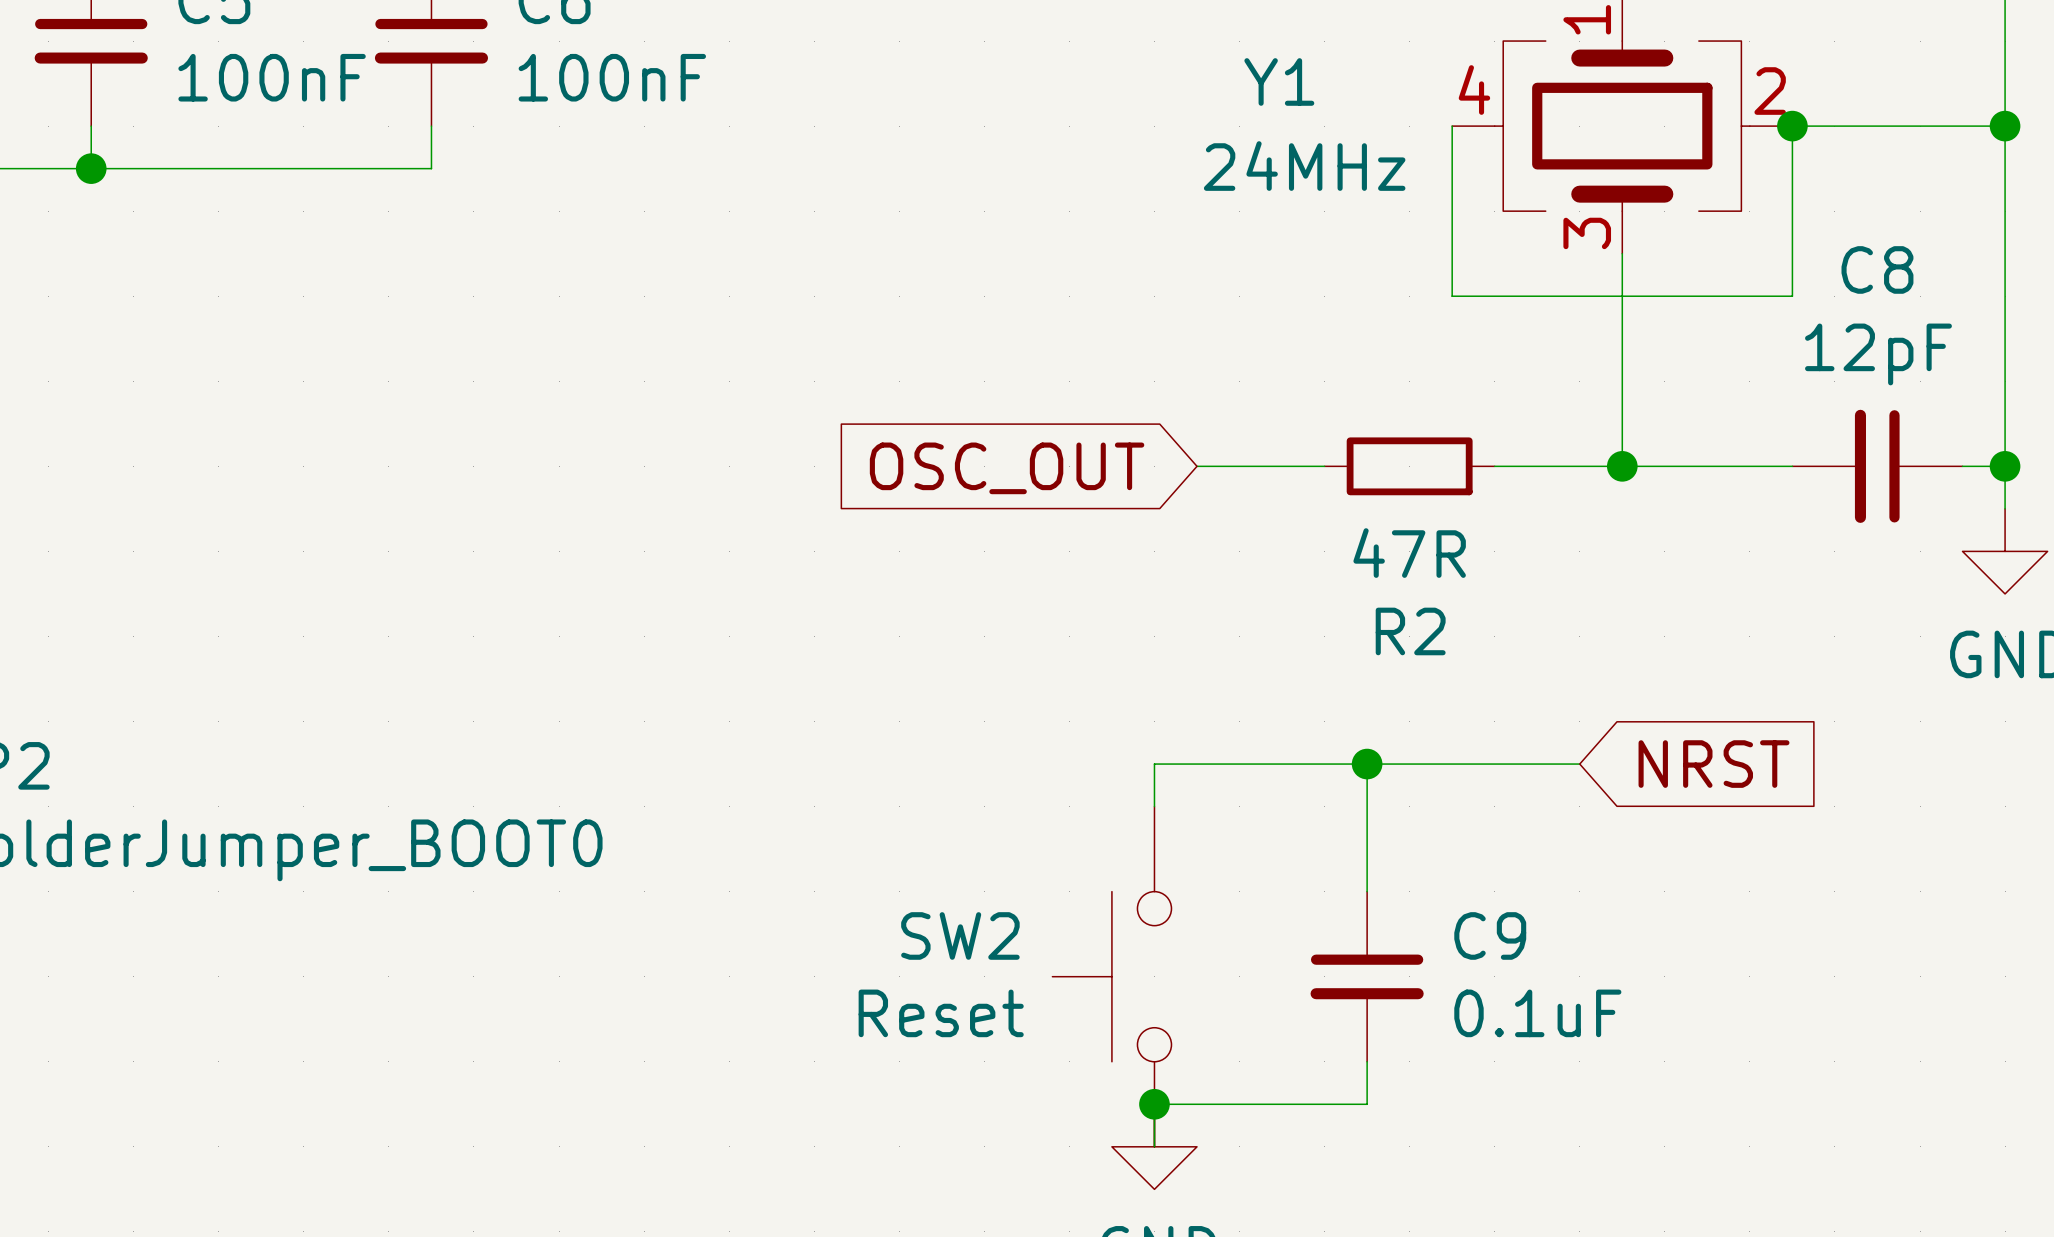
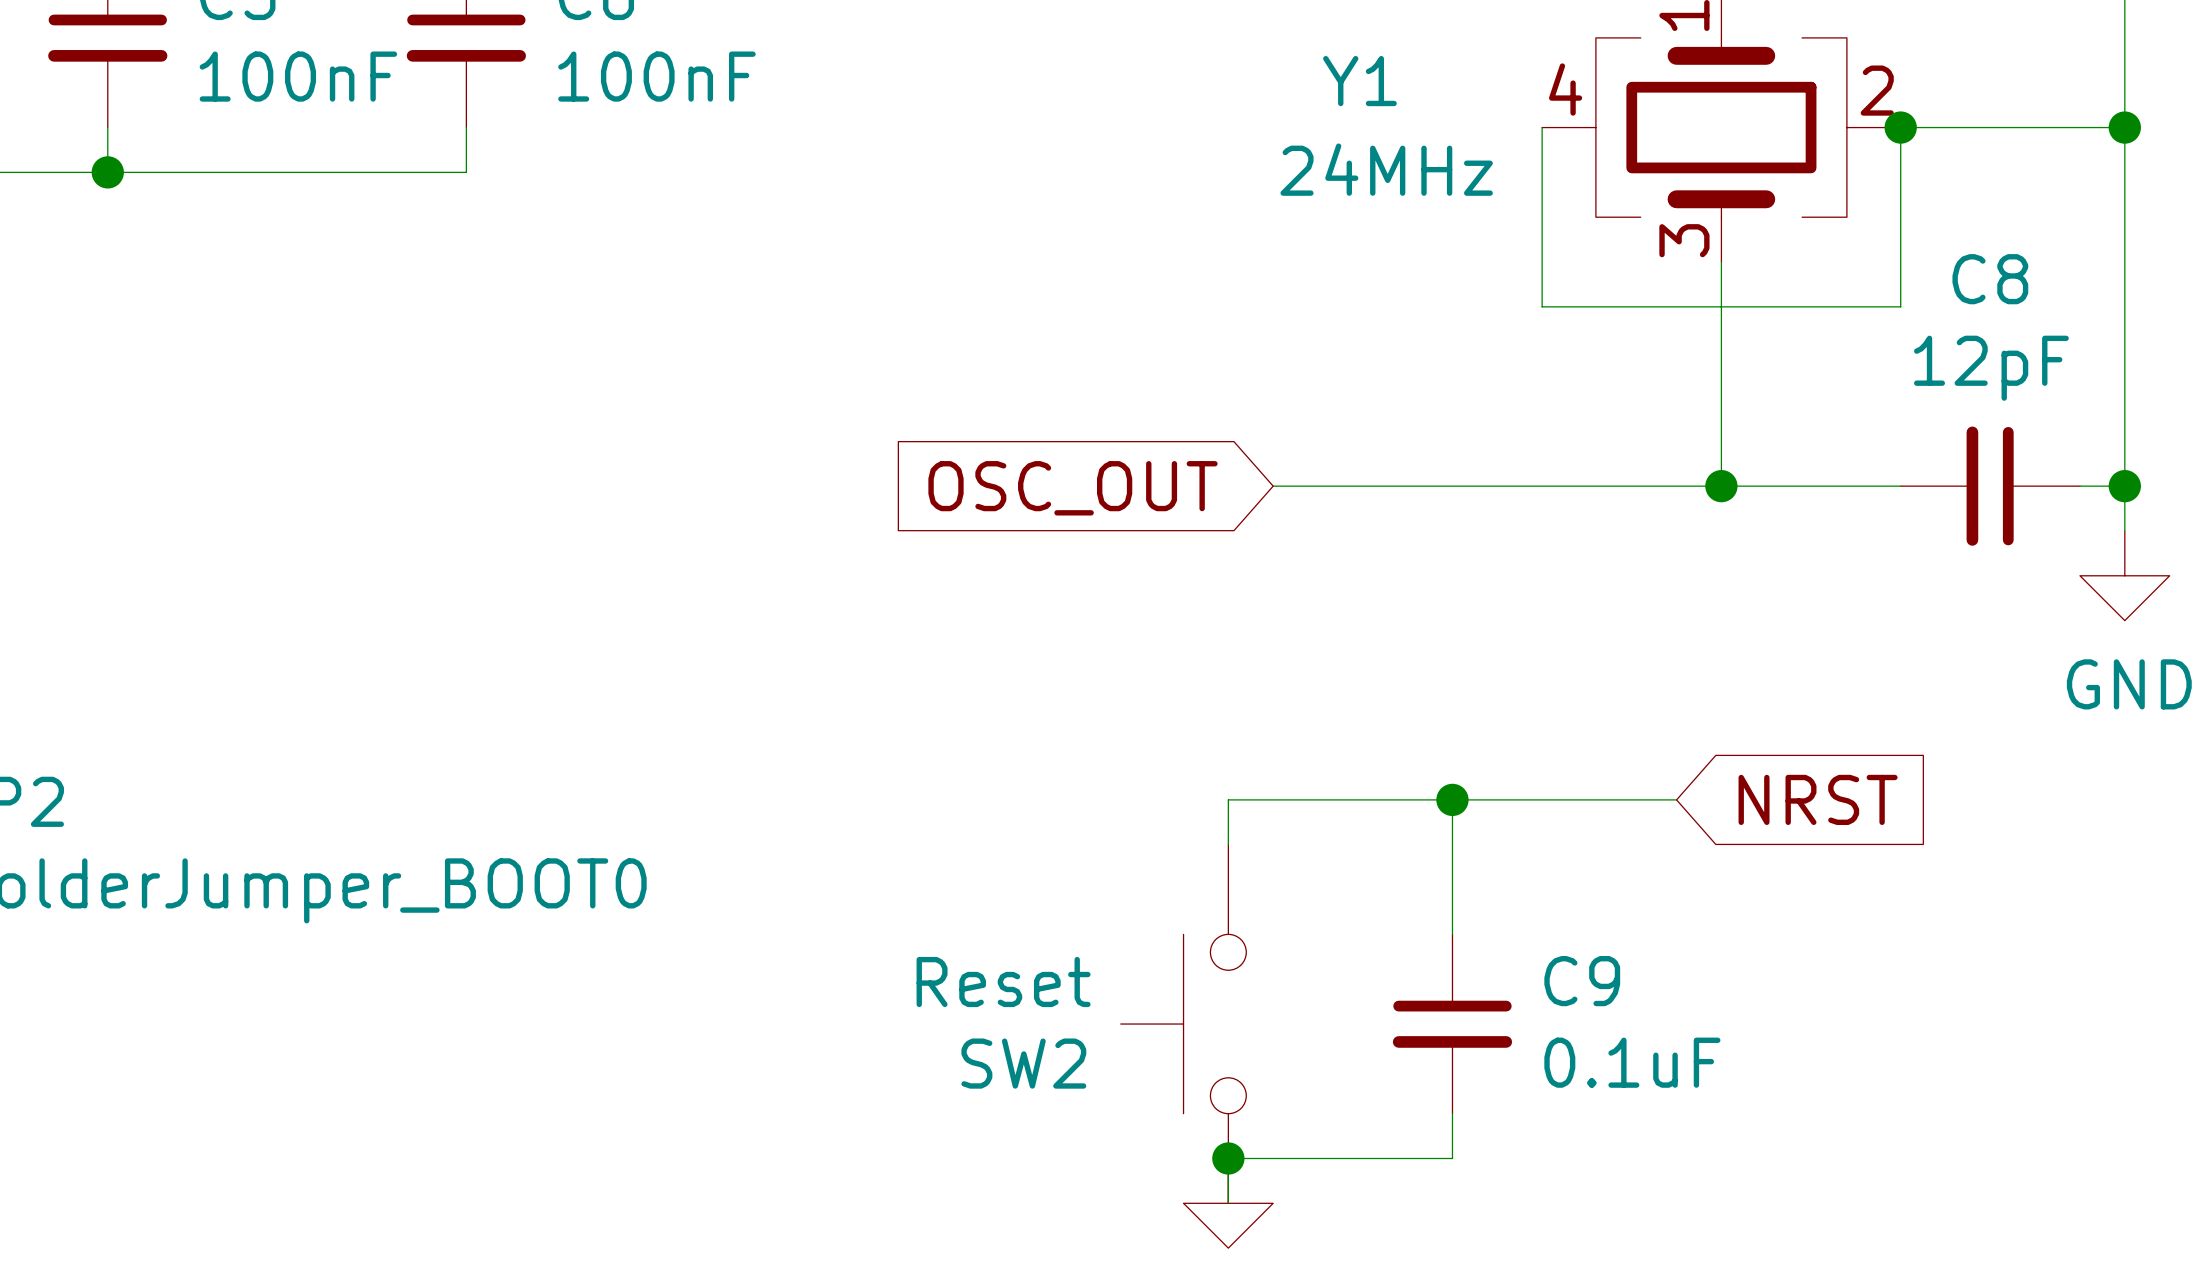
wire: none -> (1407, 486) (1586, 486)
R2: 47R (1409, 466) -> none
SW2 name position: SW2 (960, 935) -> SW2 (1023, 1063)
SW2 value position: Reset (941, 1013) -> Reset (1003, 982)

